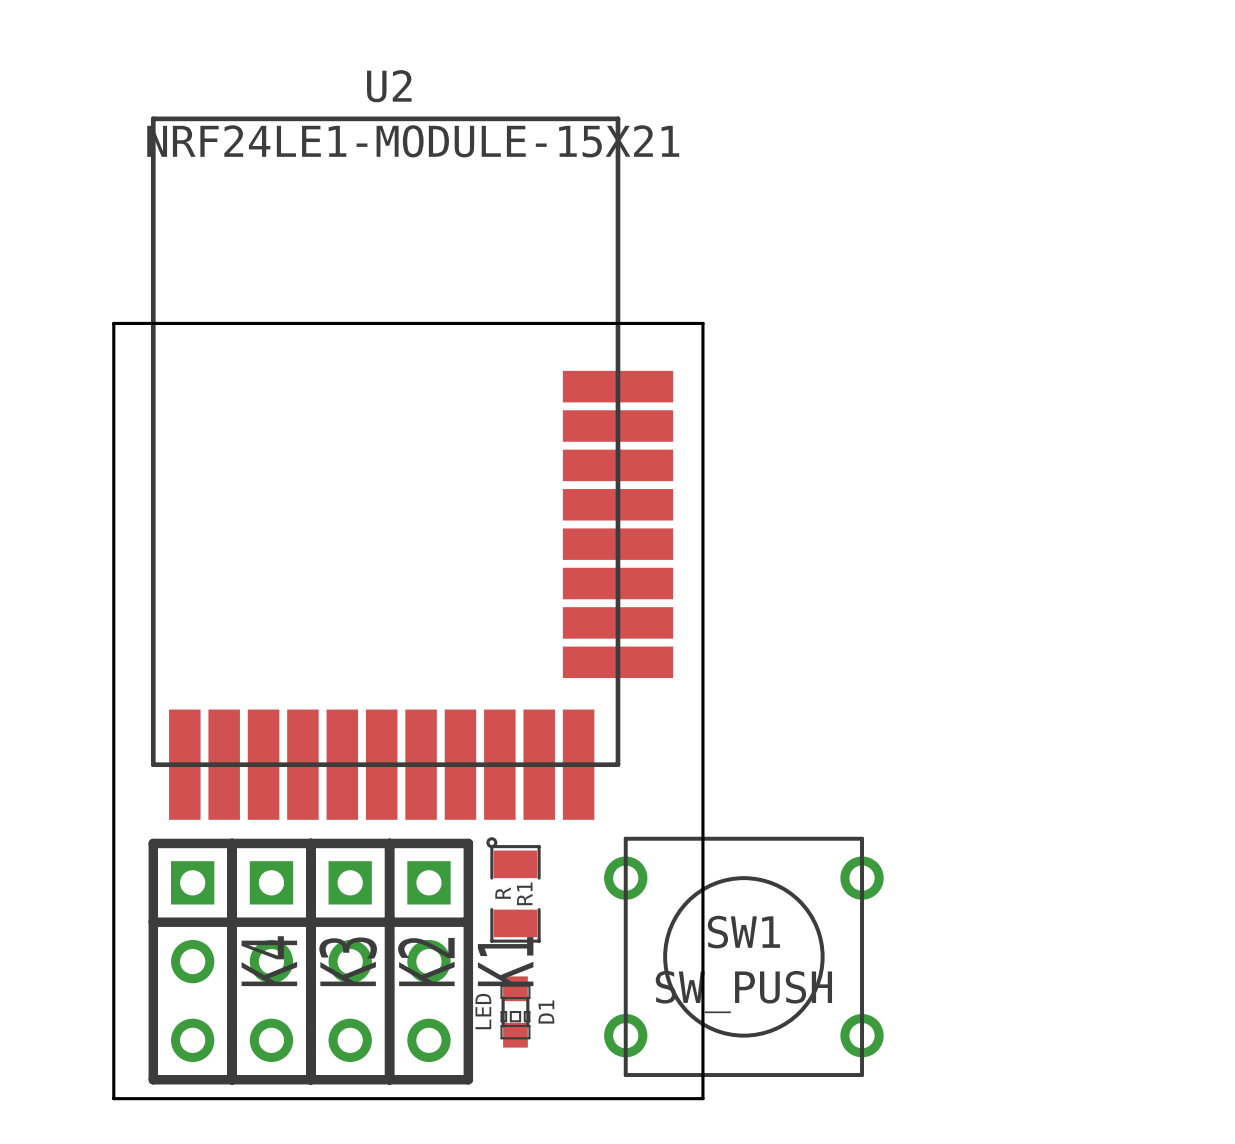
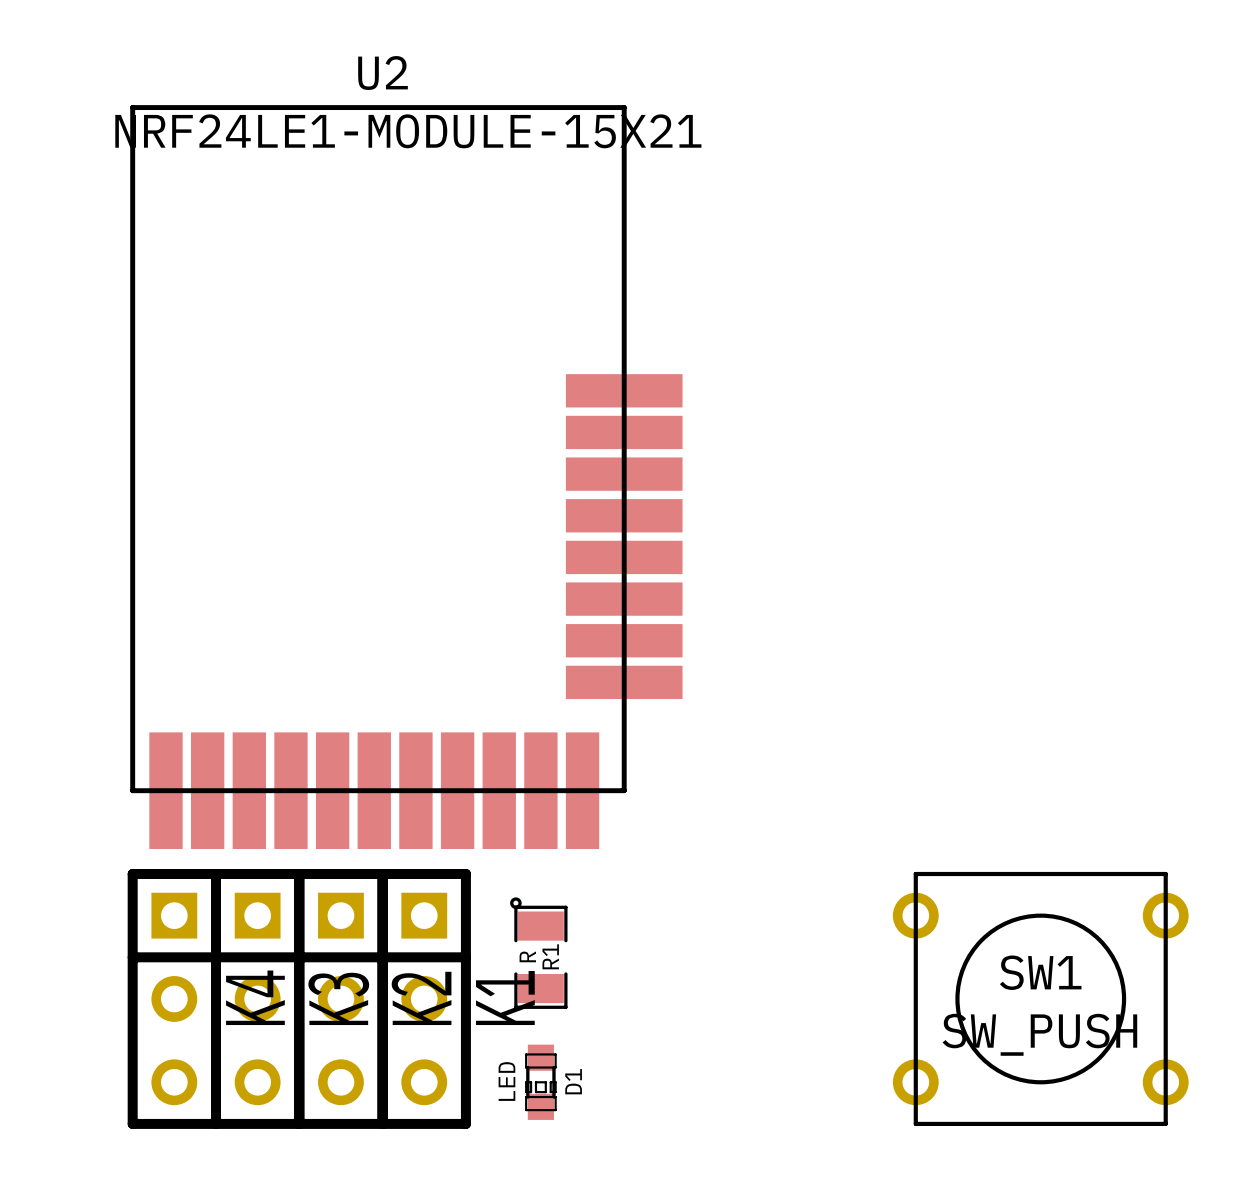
board edge: (113, 323) (702, 323) (702, 1098) (113, 1098) (113, 323) -> none
R1 position: (513, 889) -> (538, 953)
SW1 position: (743, 956) -> (1040, 998)
D1 position: (515, 1012) -> (540, 1082)

